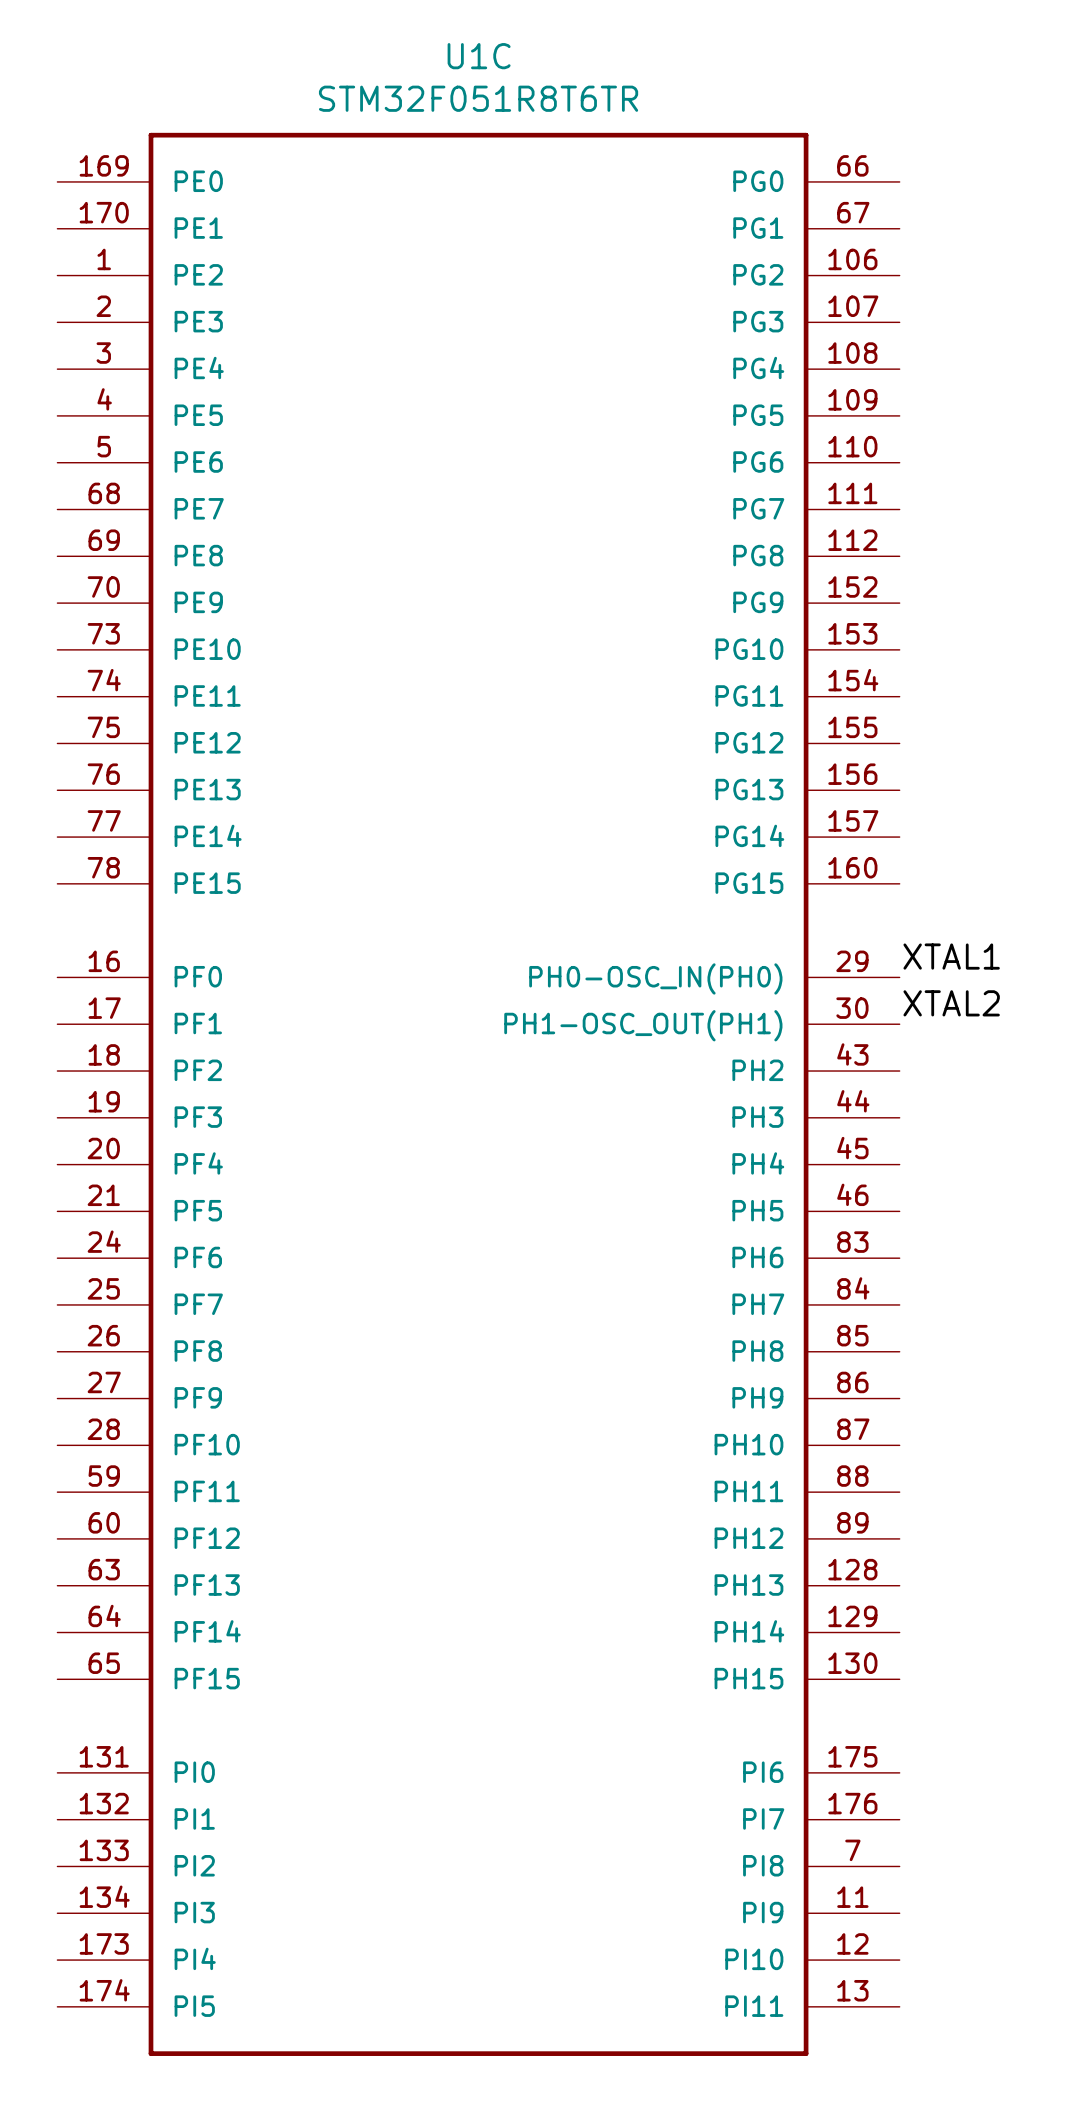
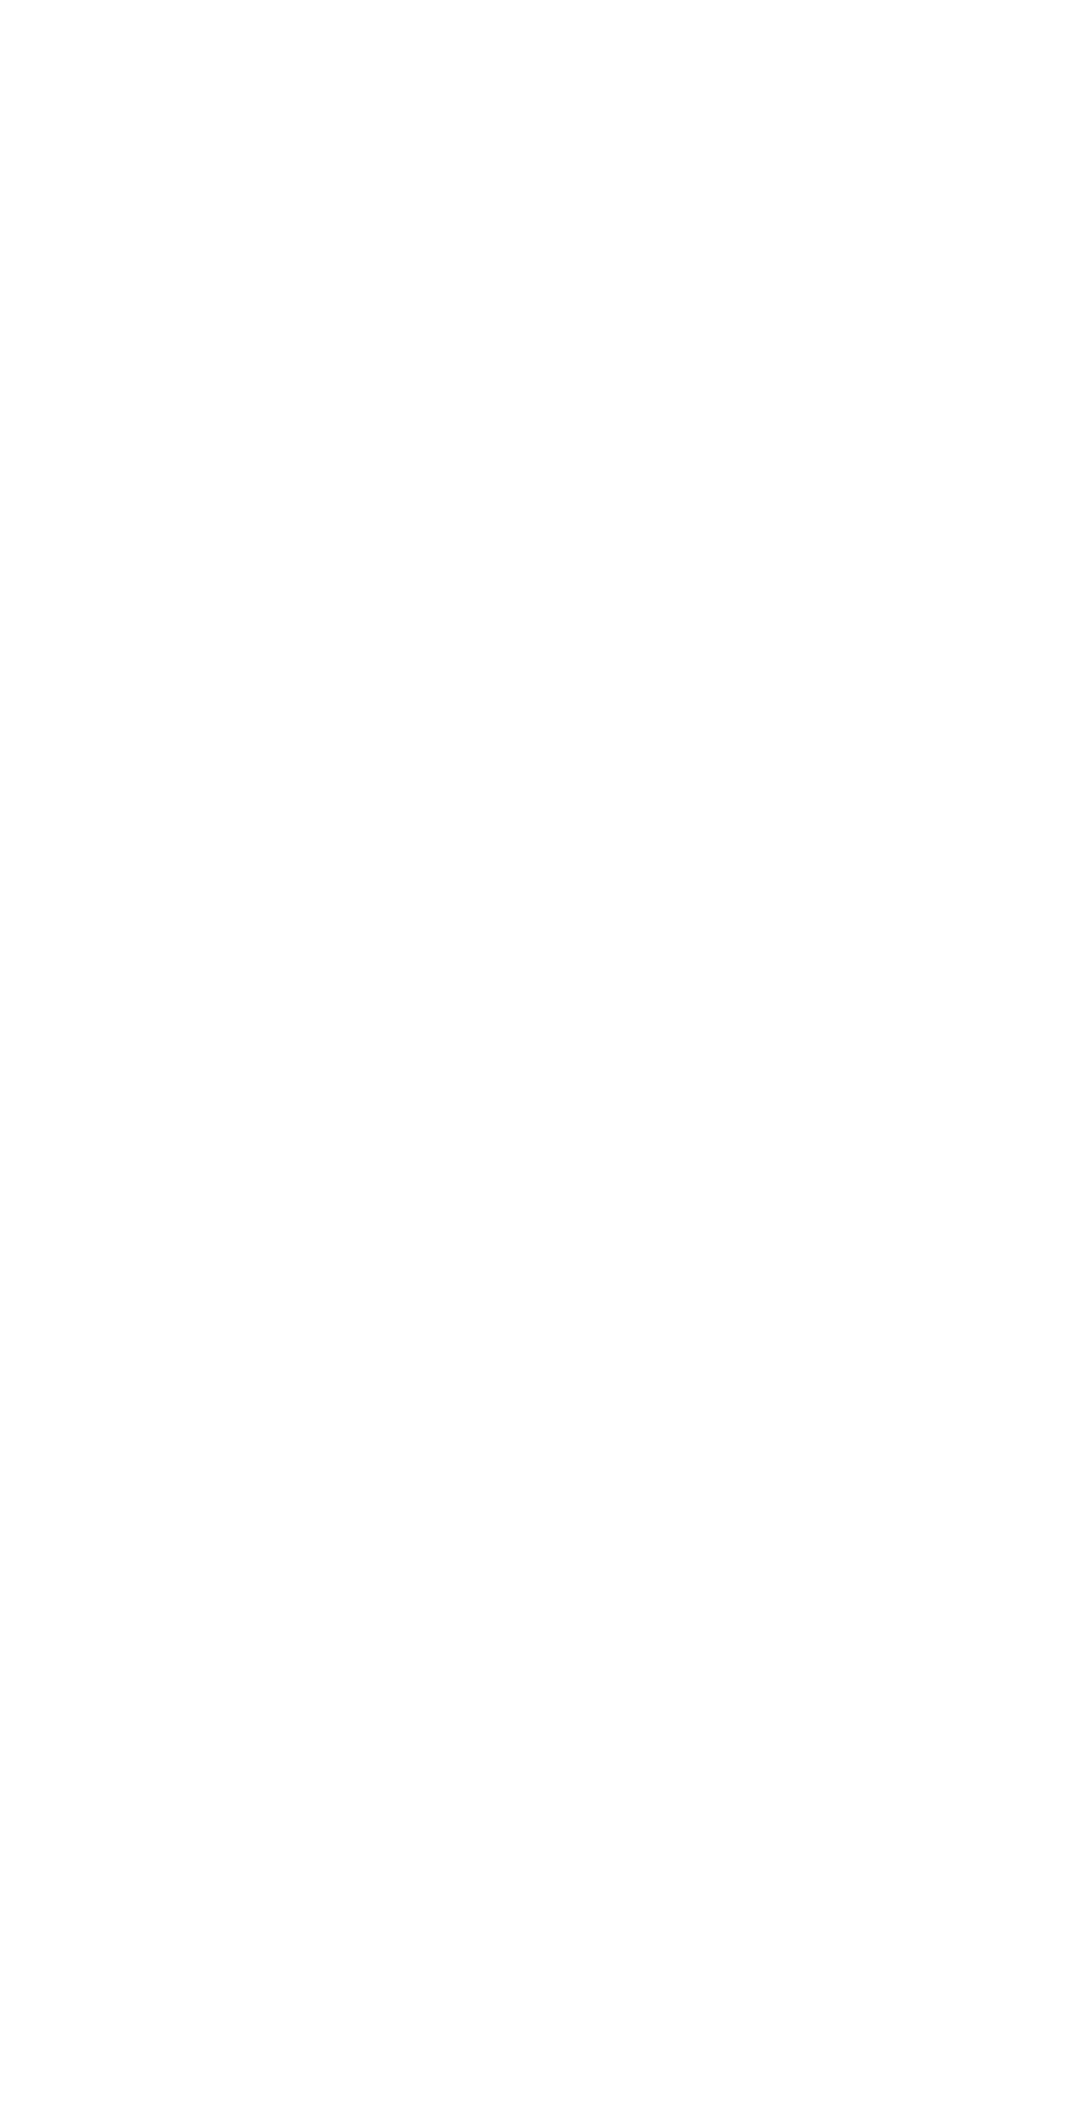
label: XTAL1 (951, 956) -> none
label: XTAL2 (951, 1003) -> none
U1C: STM32F051R8T6TR (478, 1094) -> none

